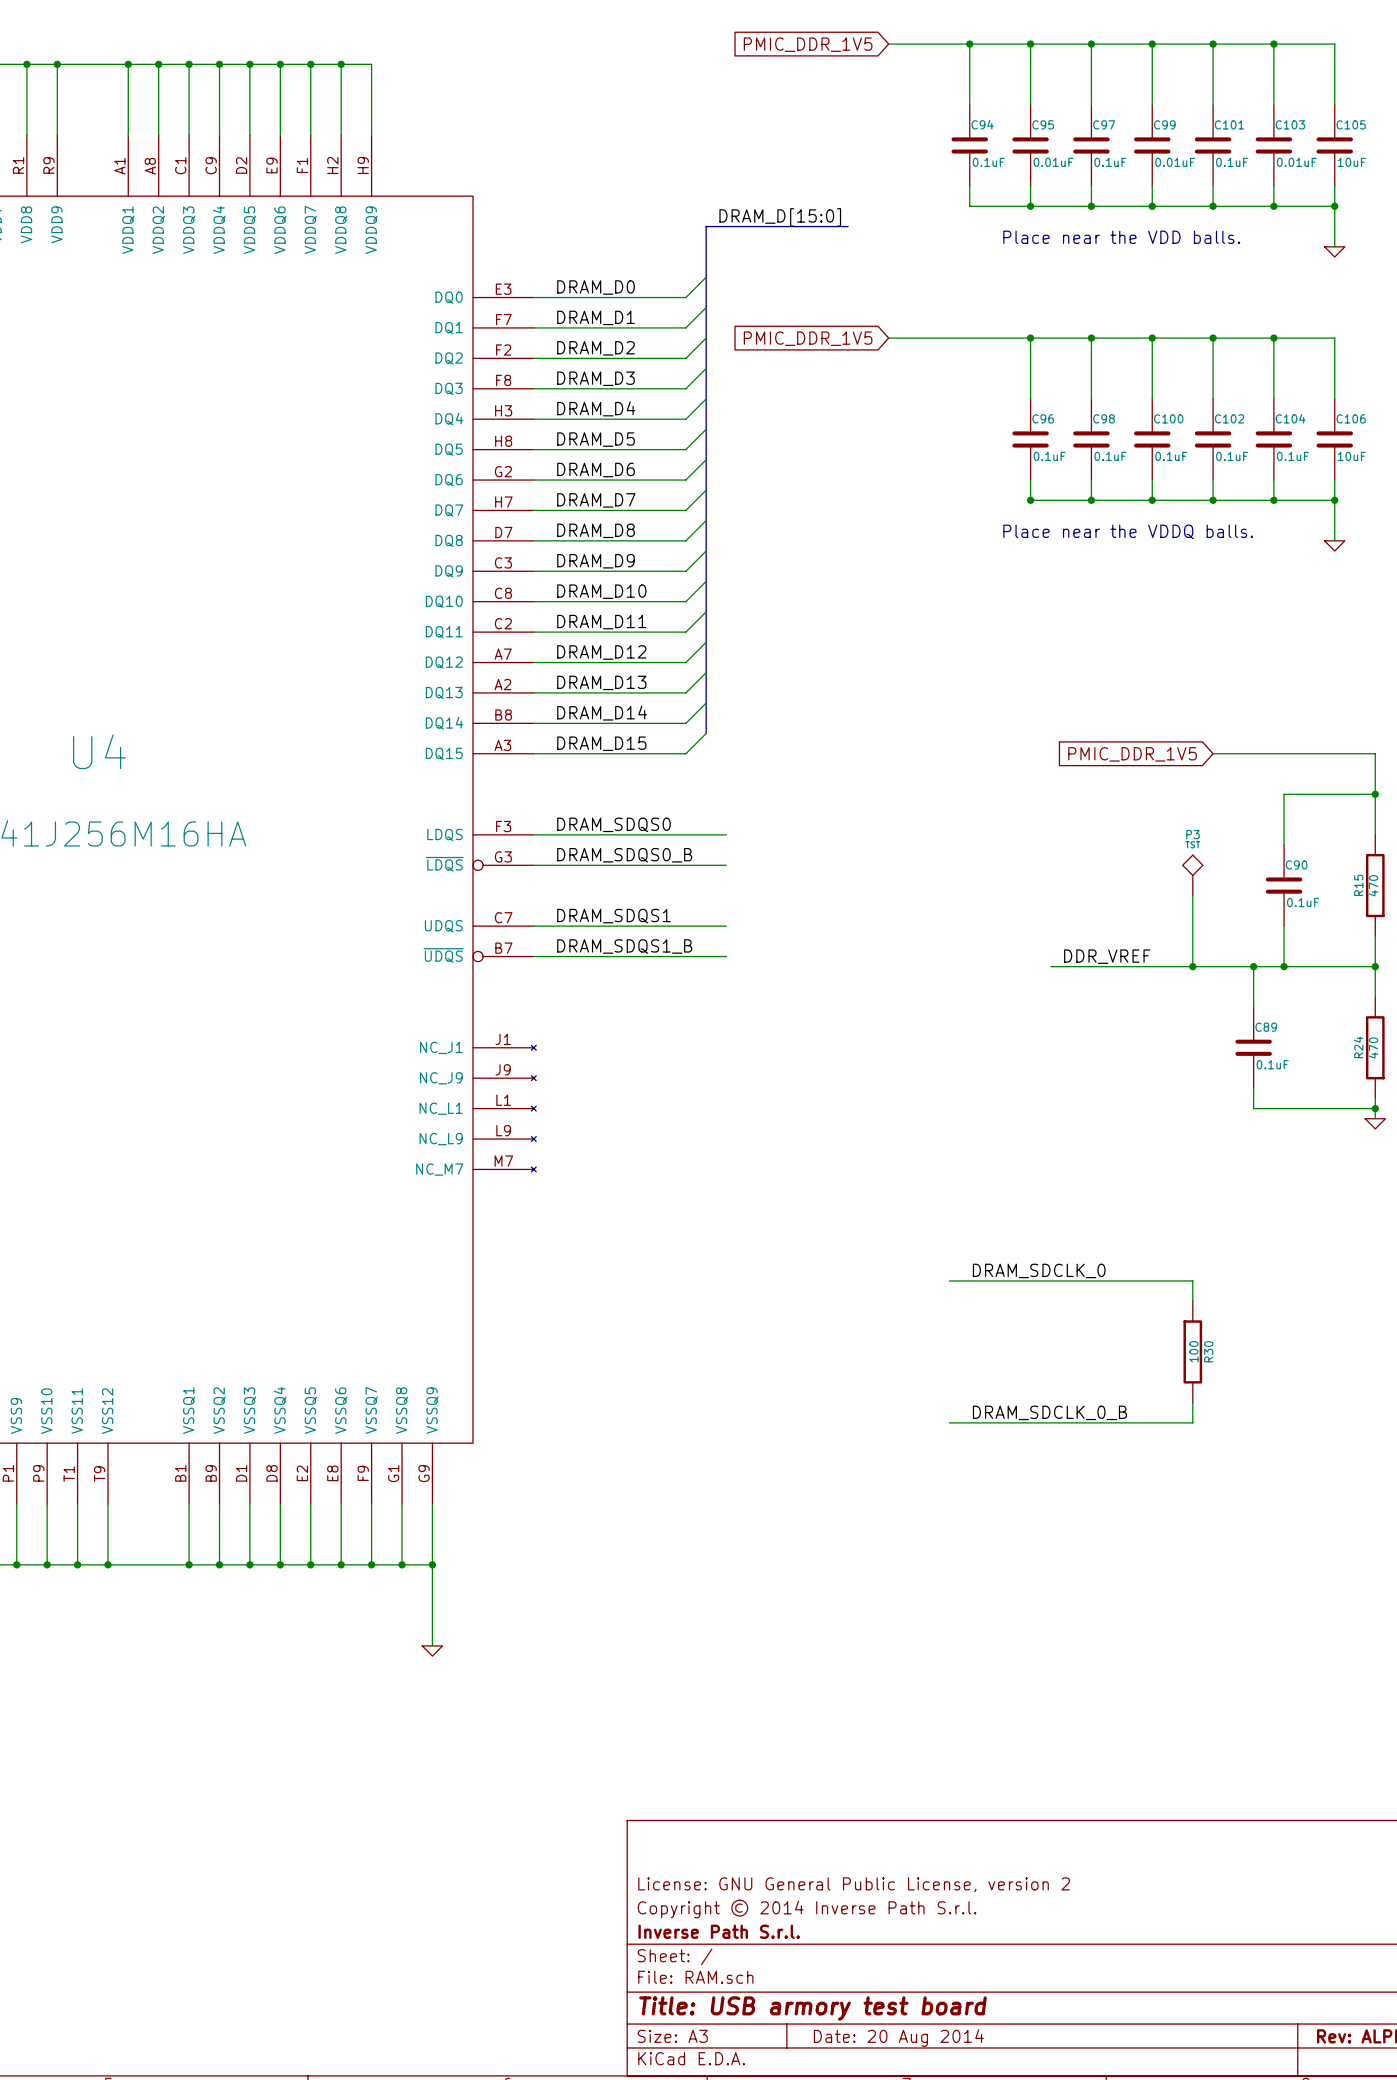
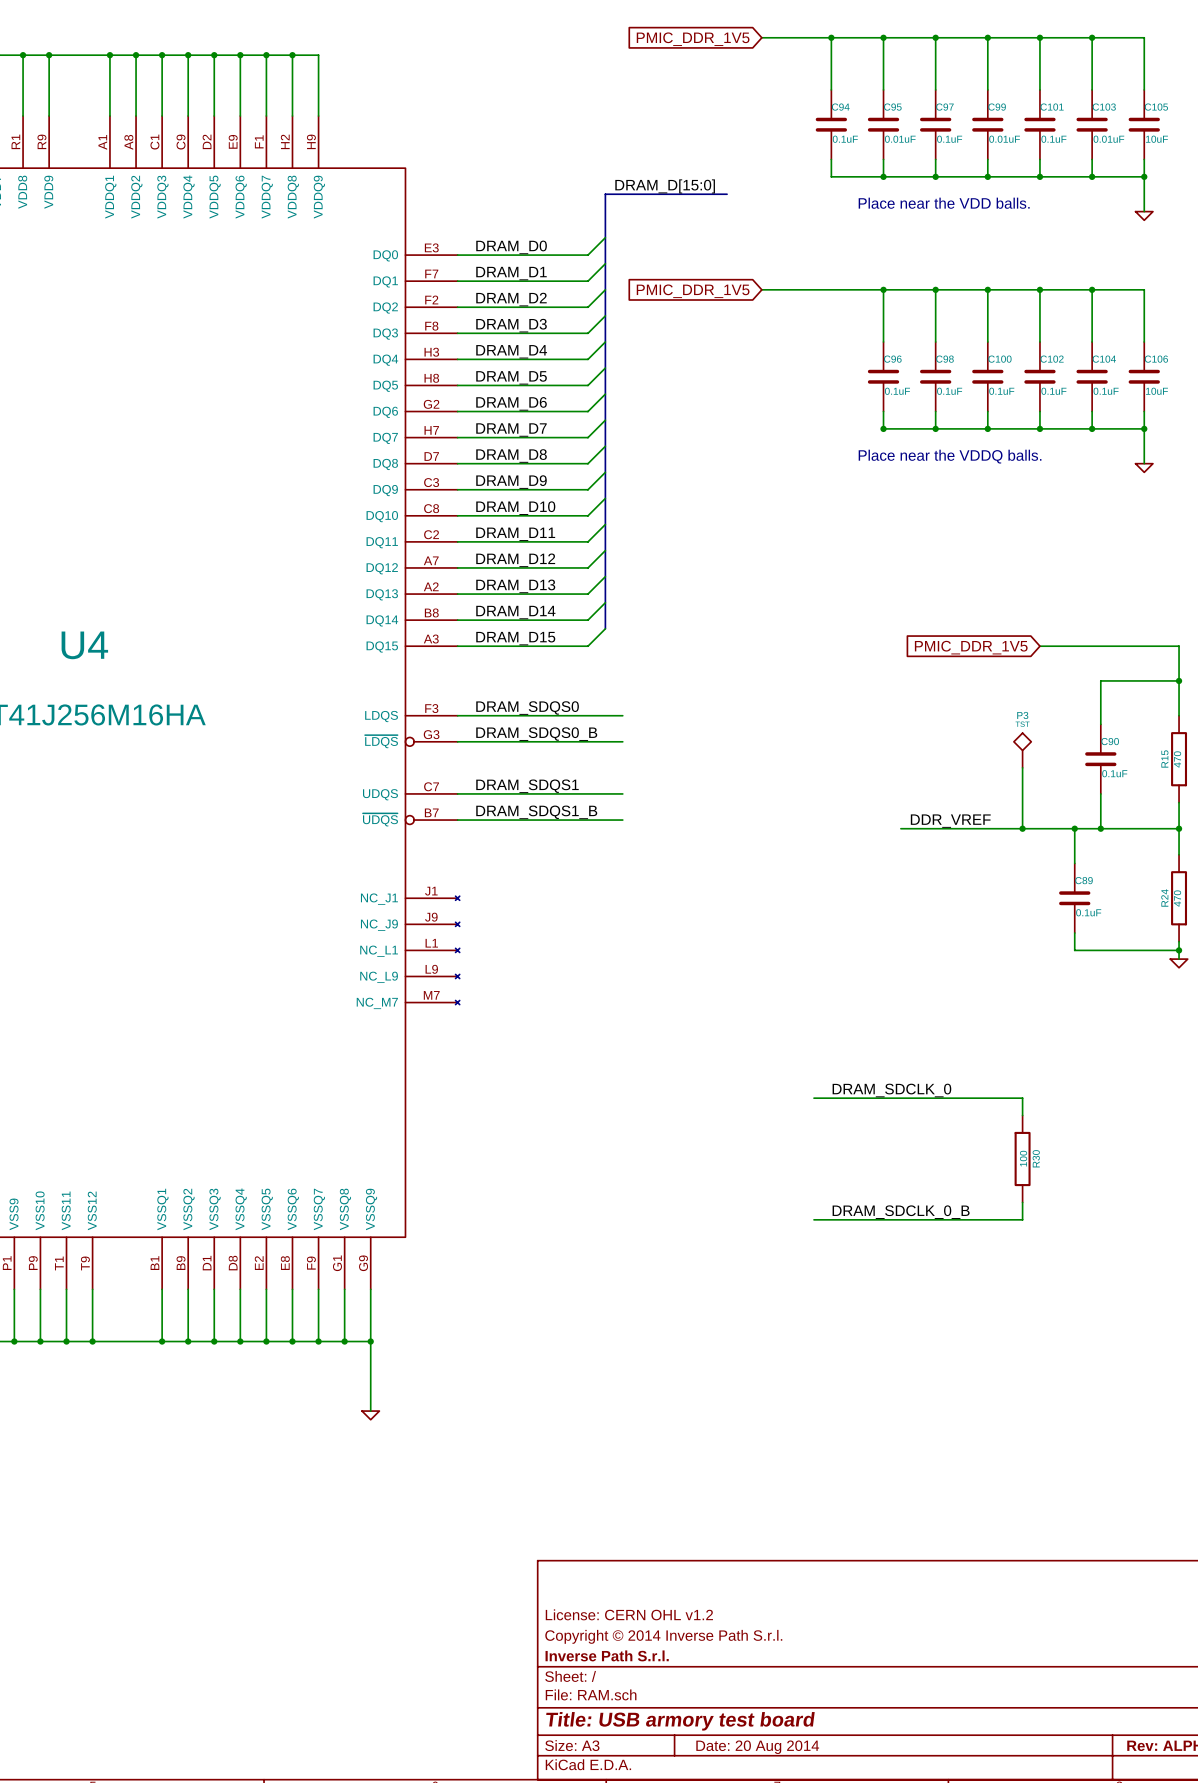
title block: License: GNU General Public License, version 2 (854, 1884) -> License: CERN OHL v1.2 (629, 1614)

